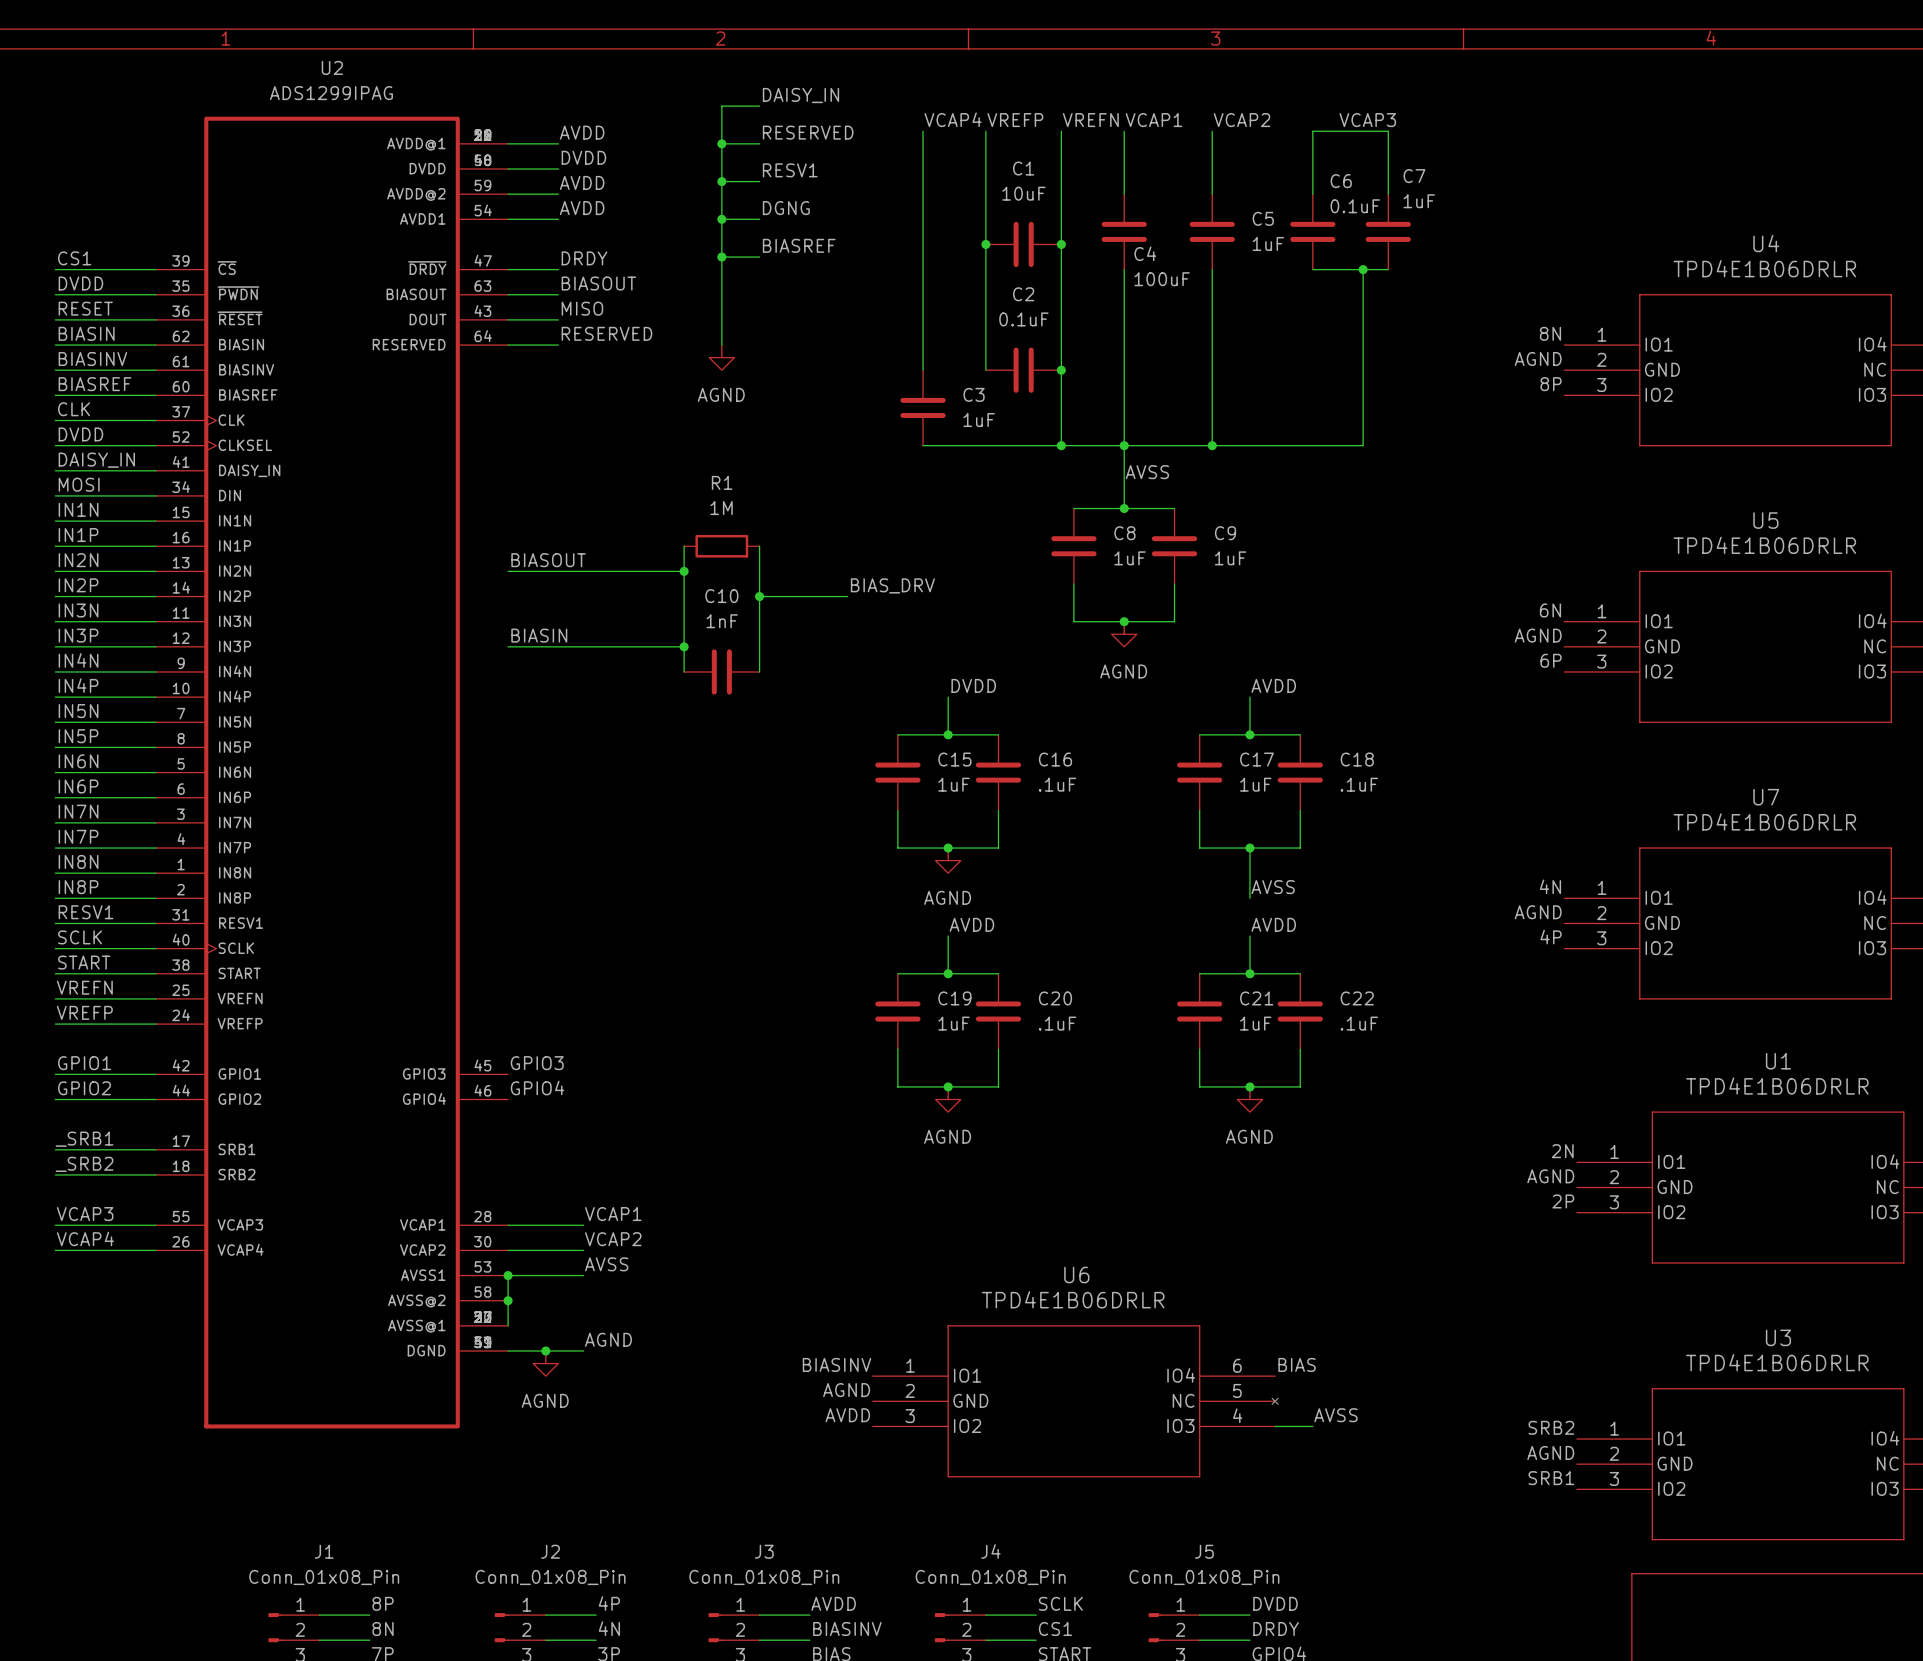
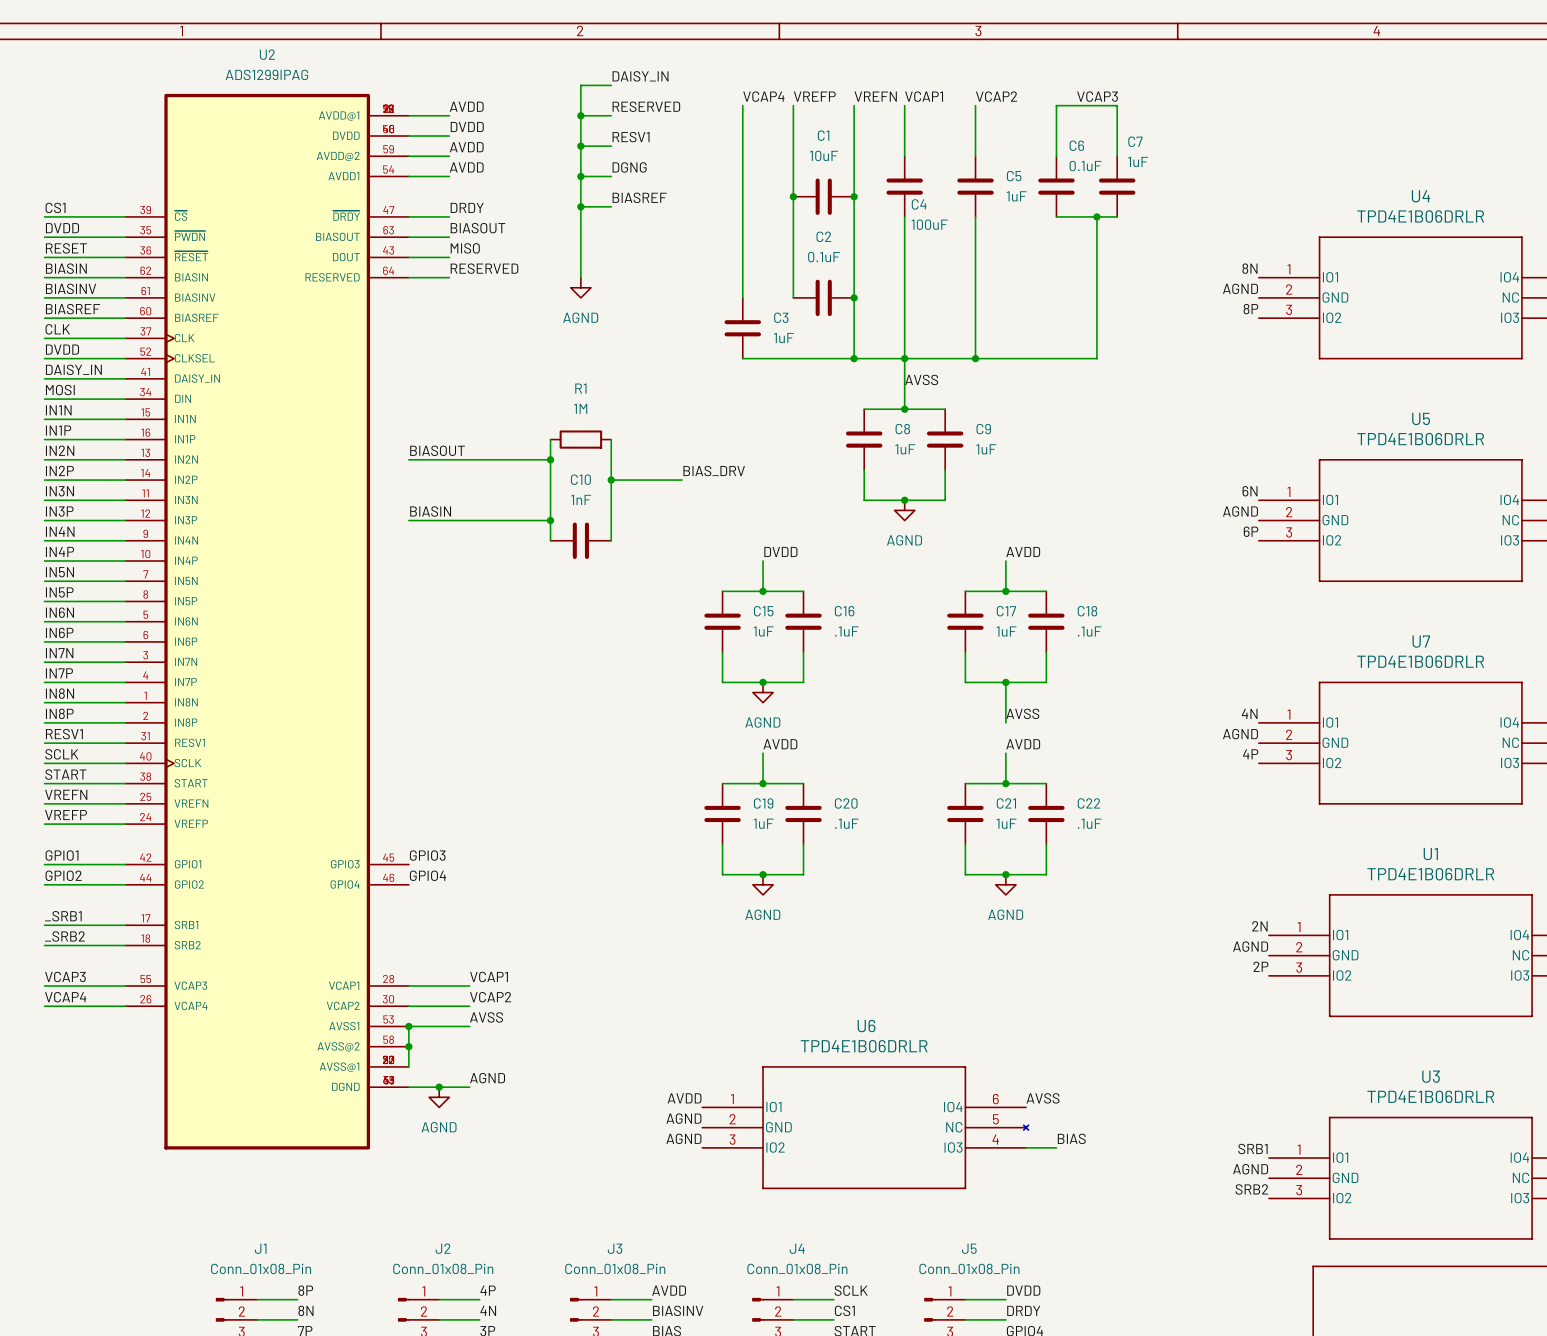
label: BIASINV (837, 1364) -> AVDD (684, 1098)
label: BIAS (1297, 1364) -> AVSS (1043, 1098)
label: AVDD (847, 1415) -> AGND (683, 1138)
label: AVSS (1335, 1415) -> BIAS (1071, 1138)
label: SRB2 (1551, 1427) -> SRB1 (1252, 1148)
label: SRB1 (1551, 1478) -> SRB2 (1251, 1189)

